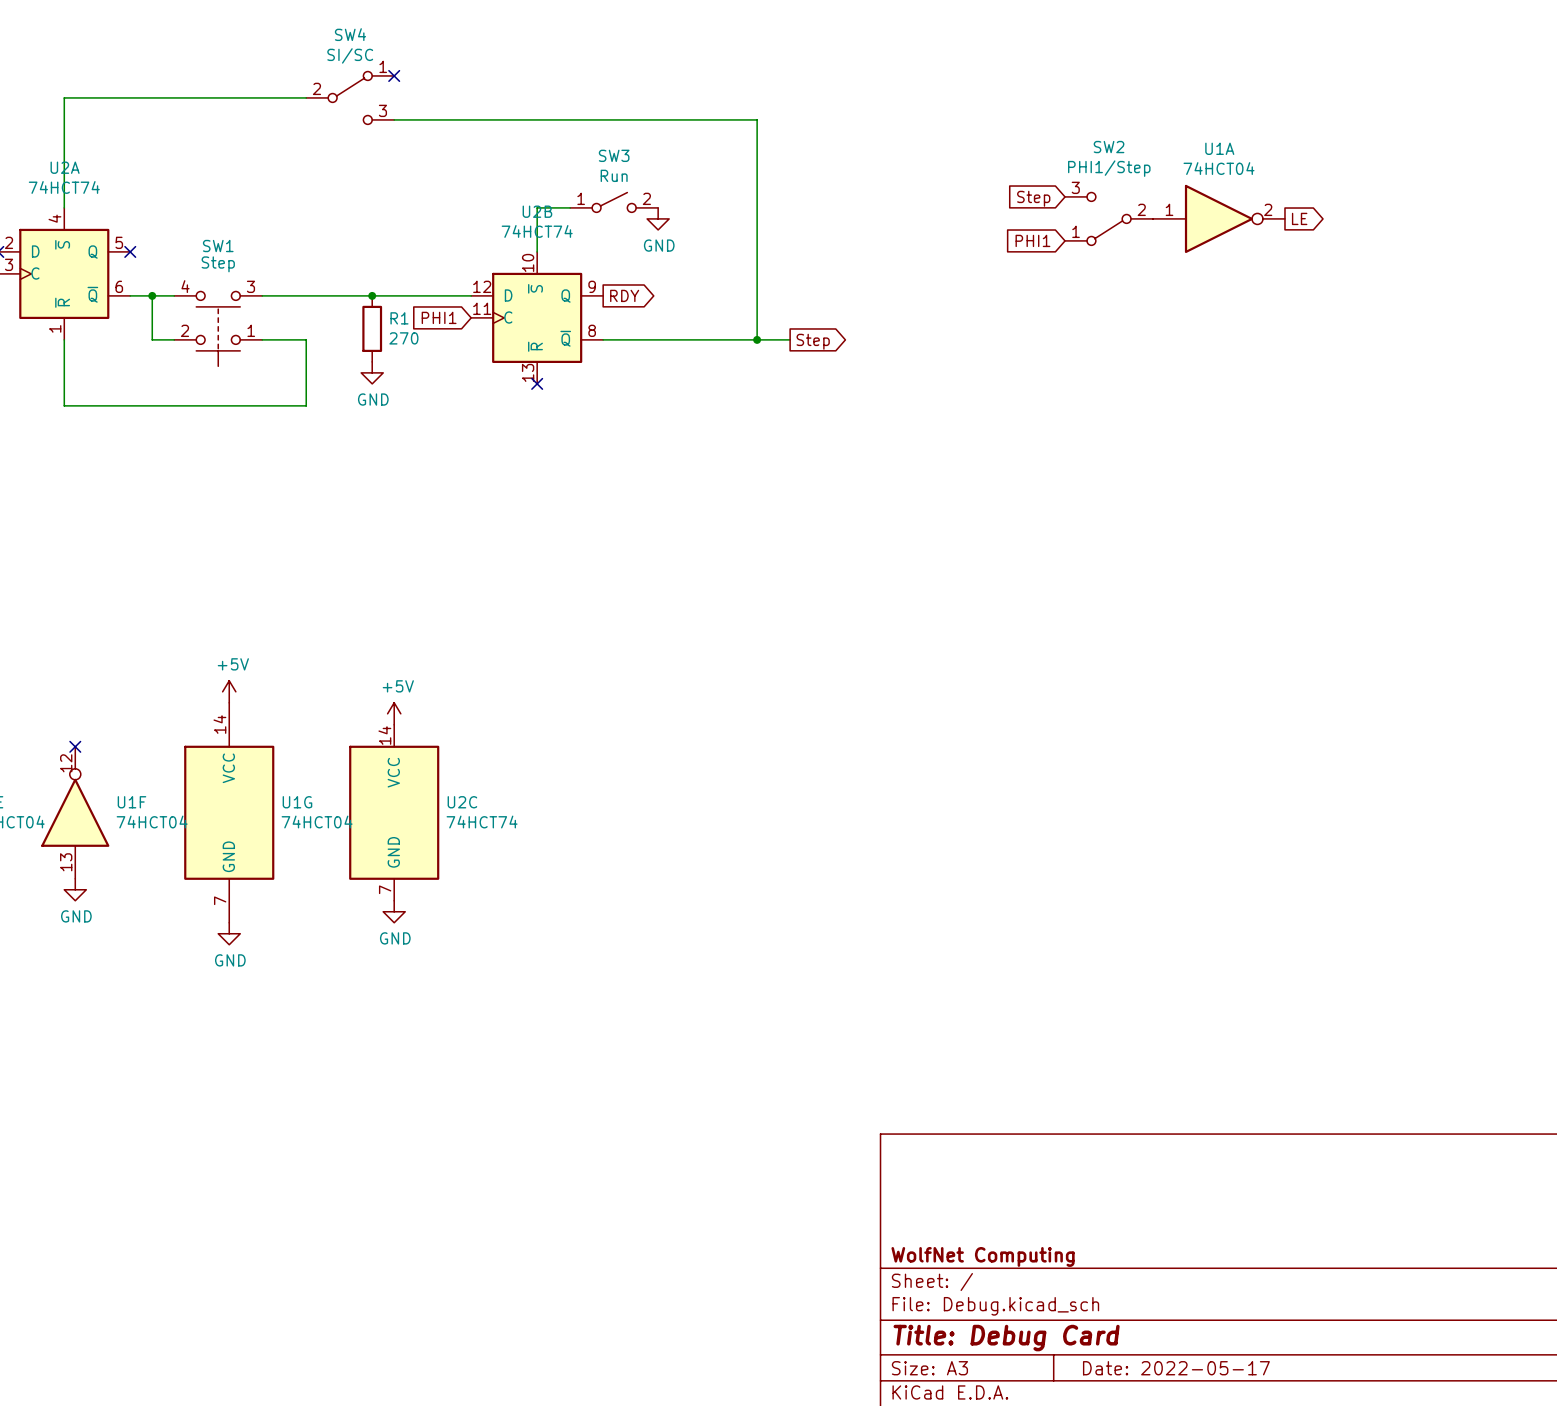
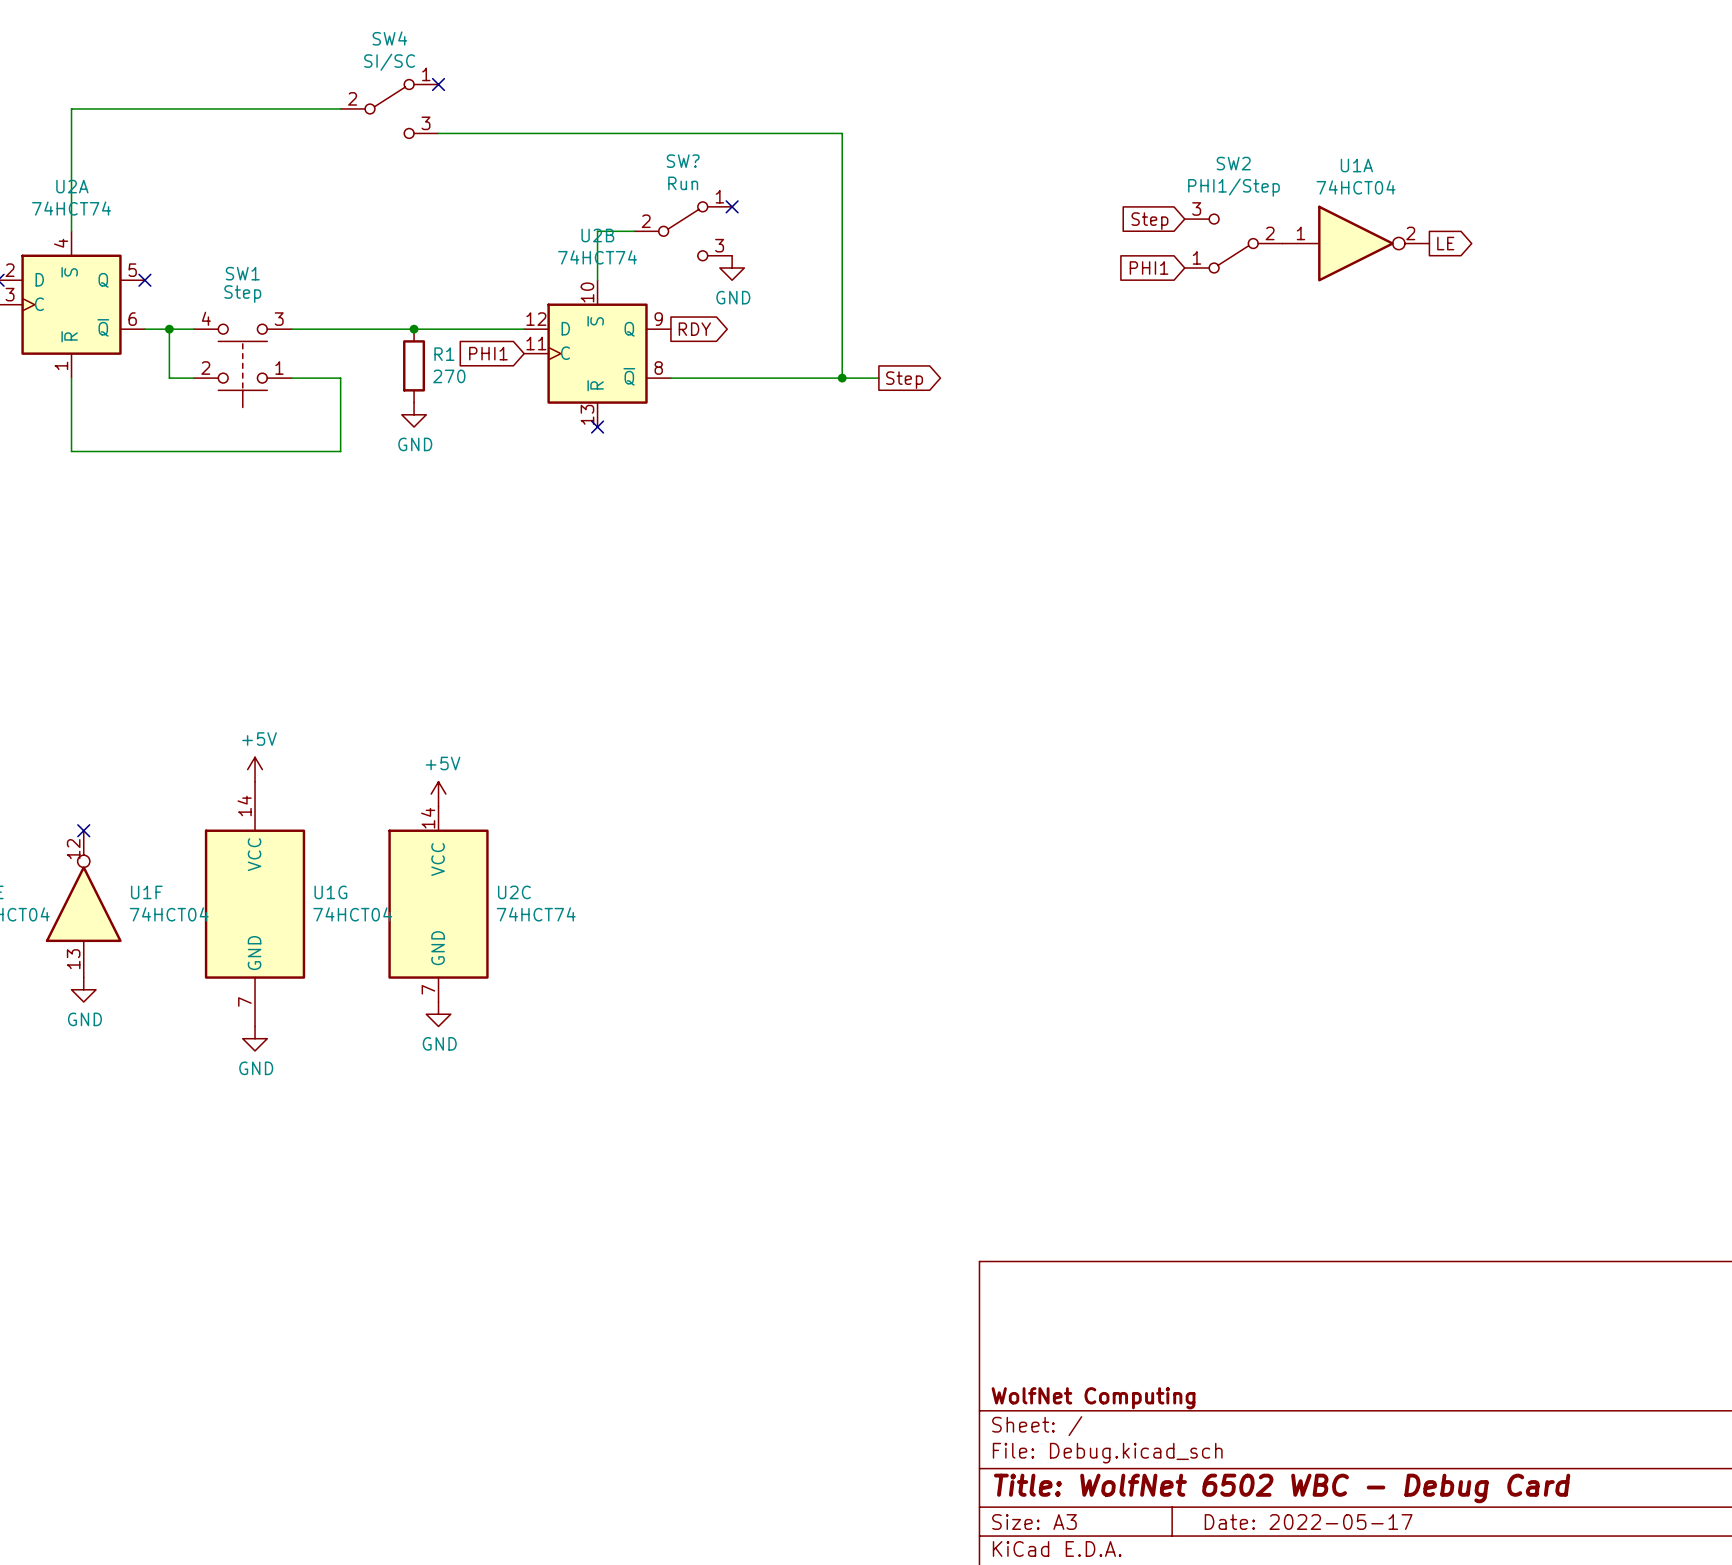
no-connect mark: none -> (732, 206)
SW3: Run (614, 202) -> none
SW?: none -> Run (683, 231)
power symbol position: GND (658, 218) -> GND (732, 268)
title block: Title: Debug Card (1006, 1338) -> Title: WolfNet 6502 WBC - Debug Card (1282, 1488)

